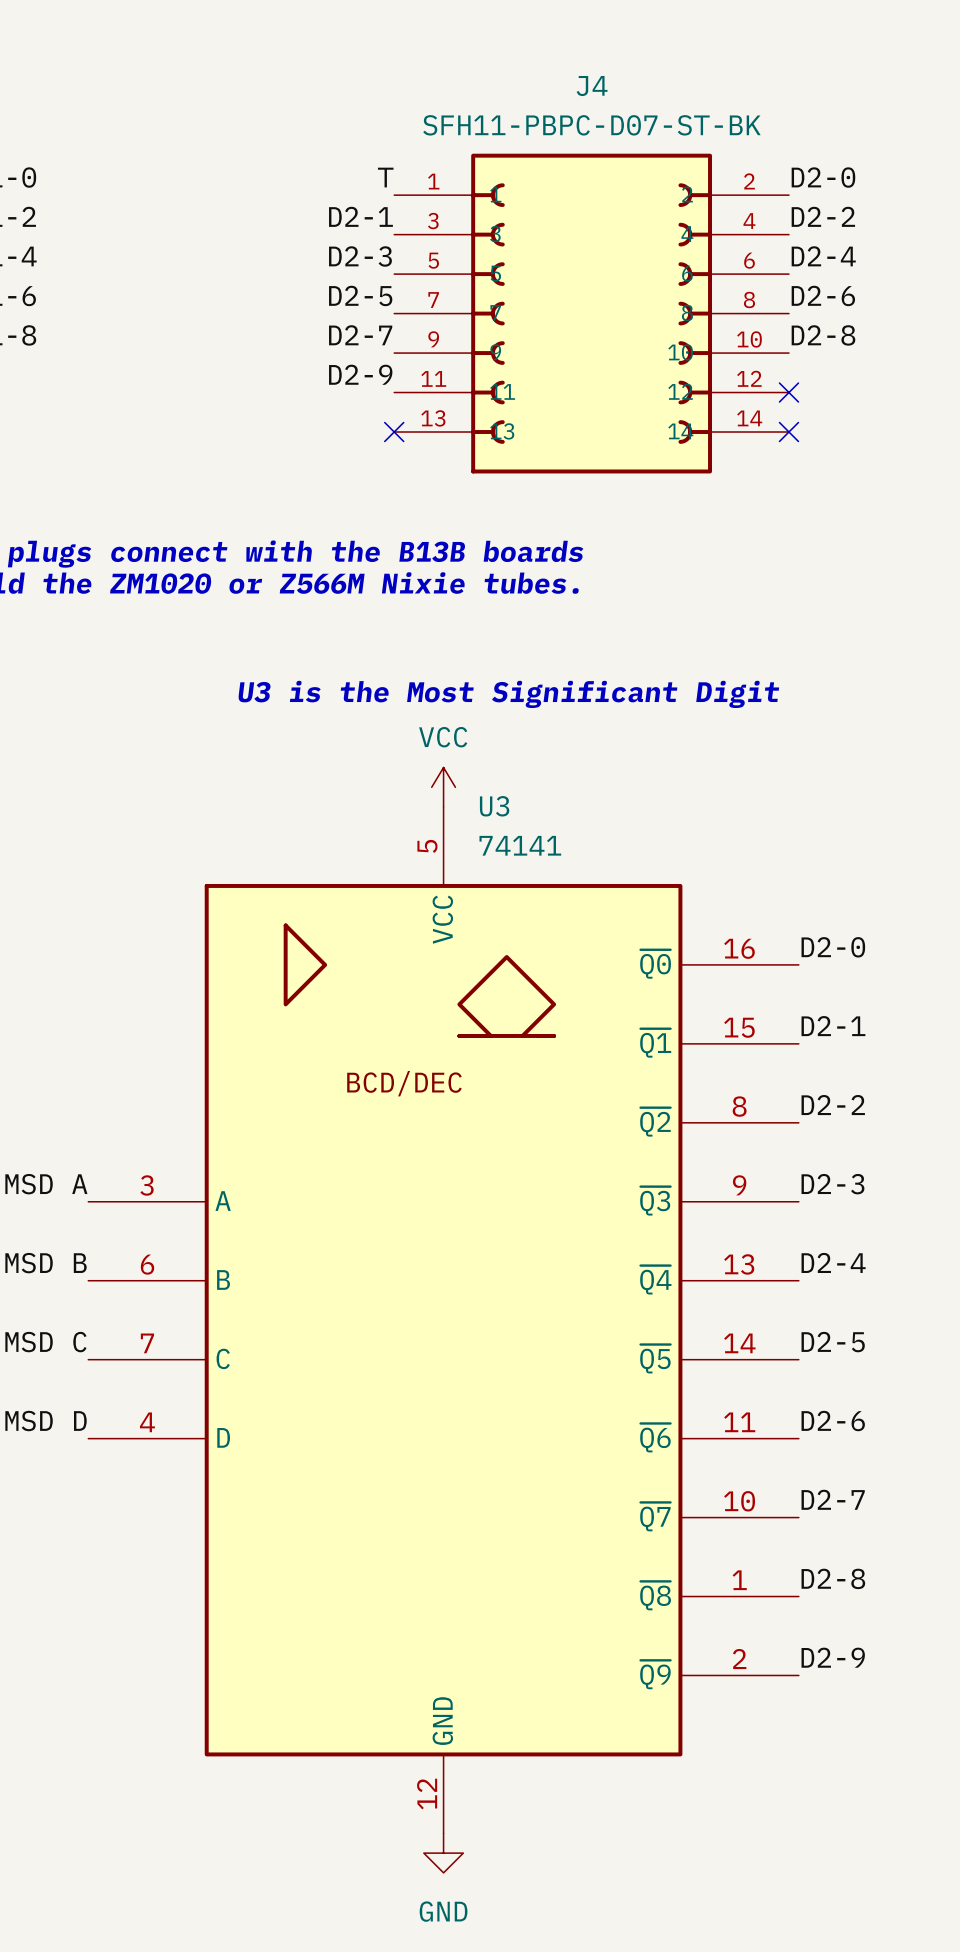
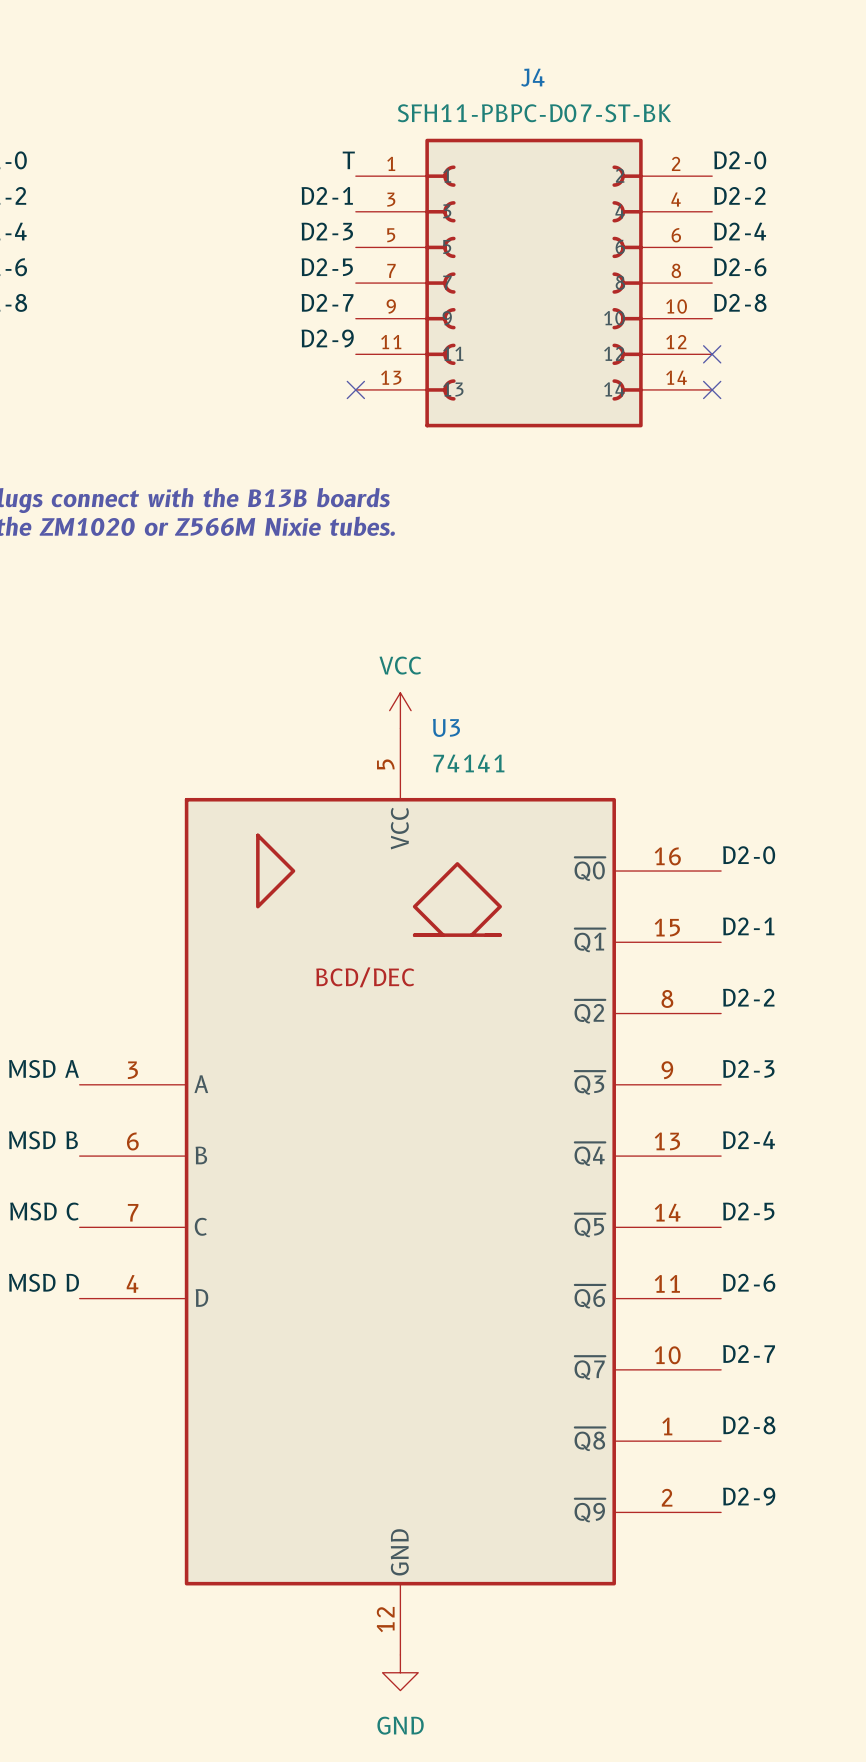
text: U3 is the Most Significant Digit (508, 694) -> none

